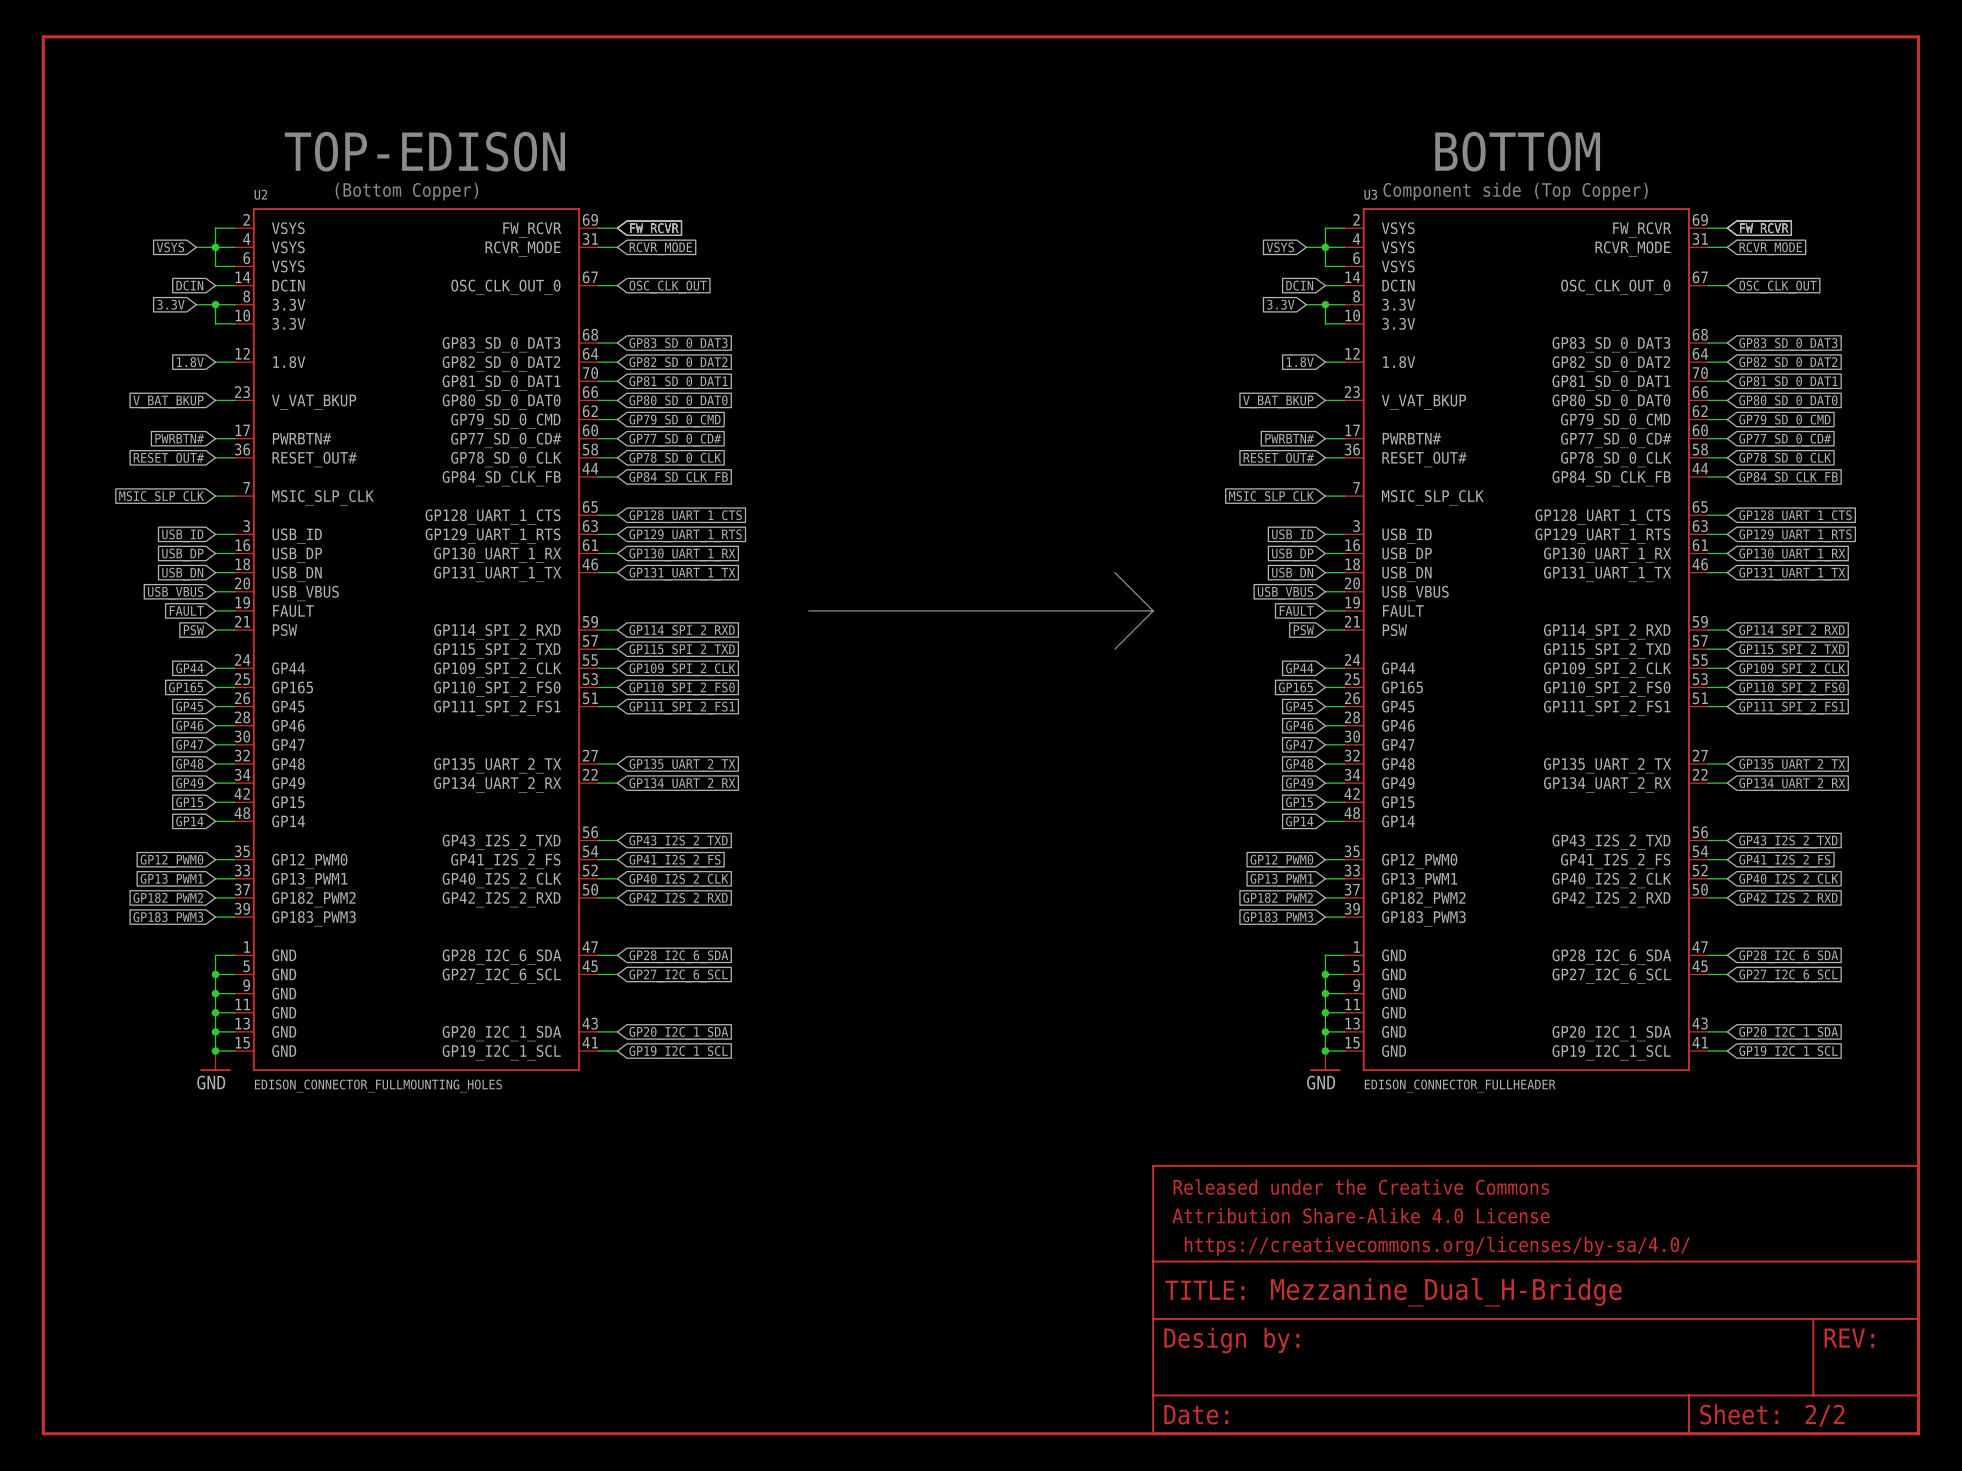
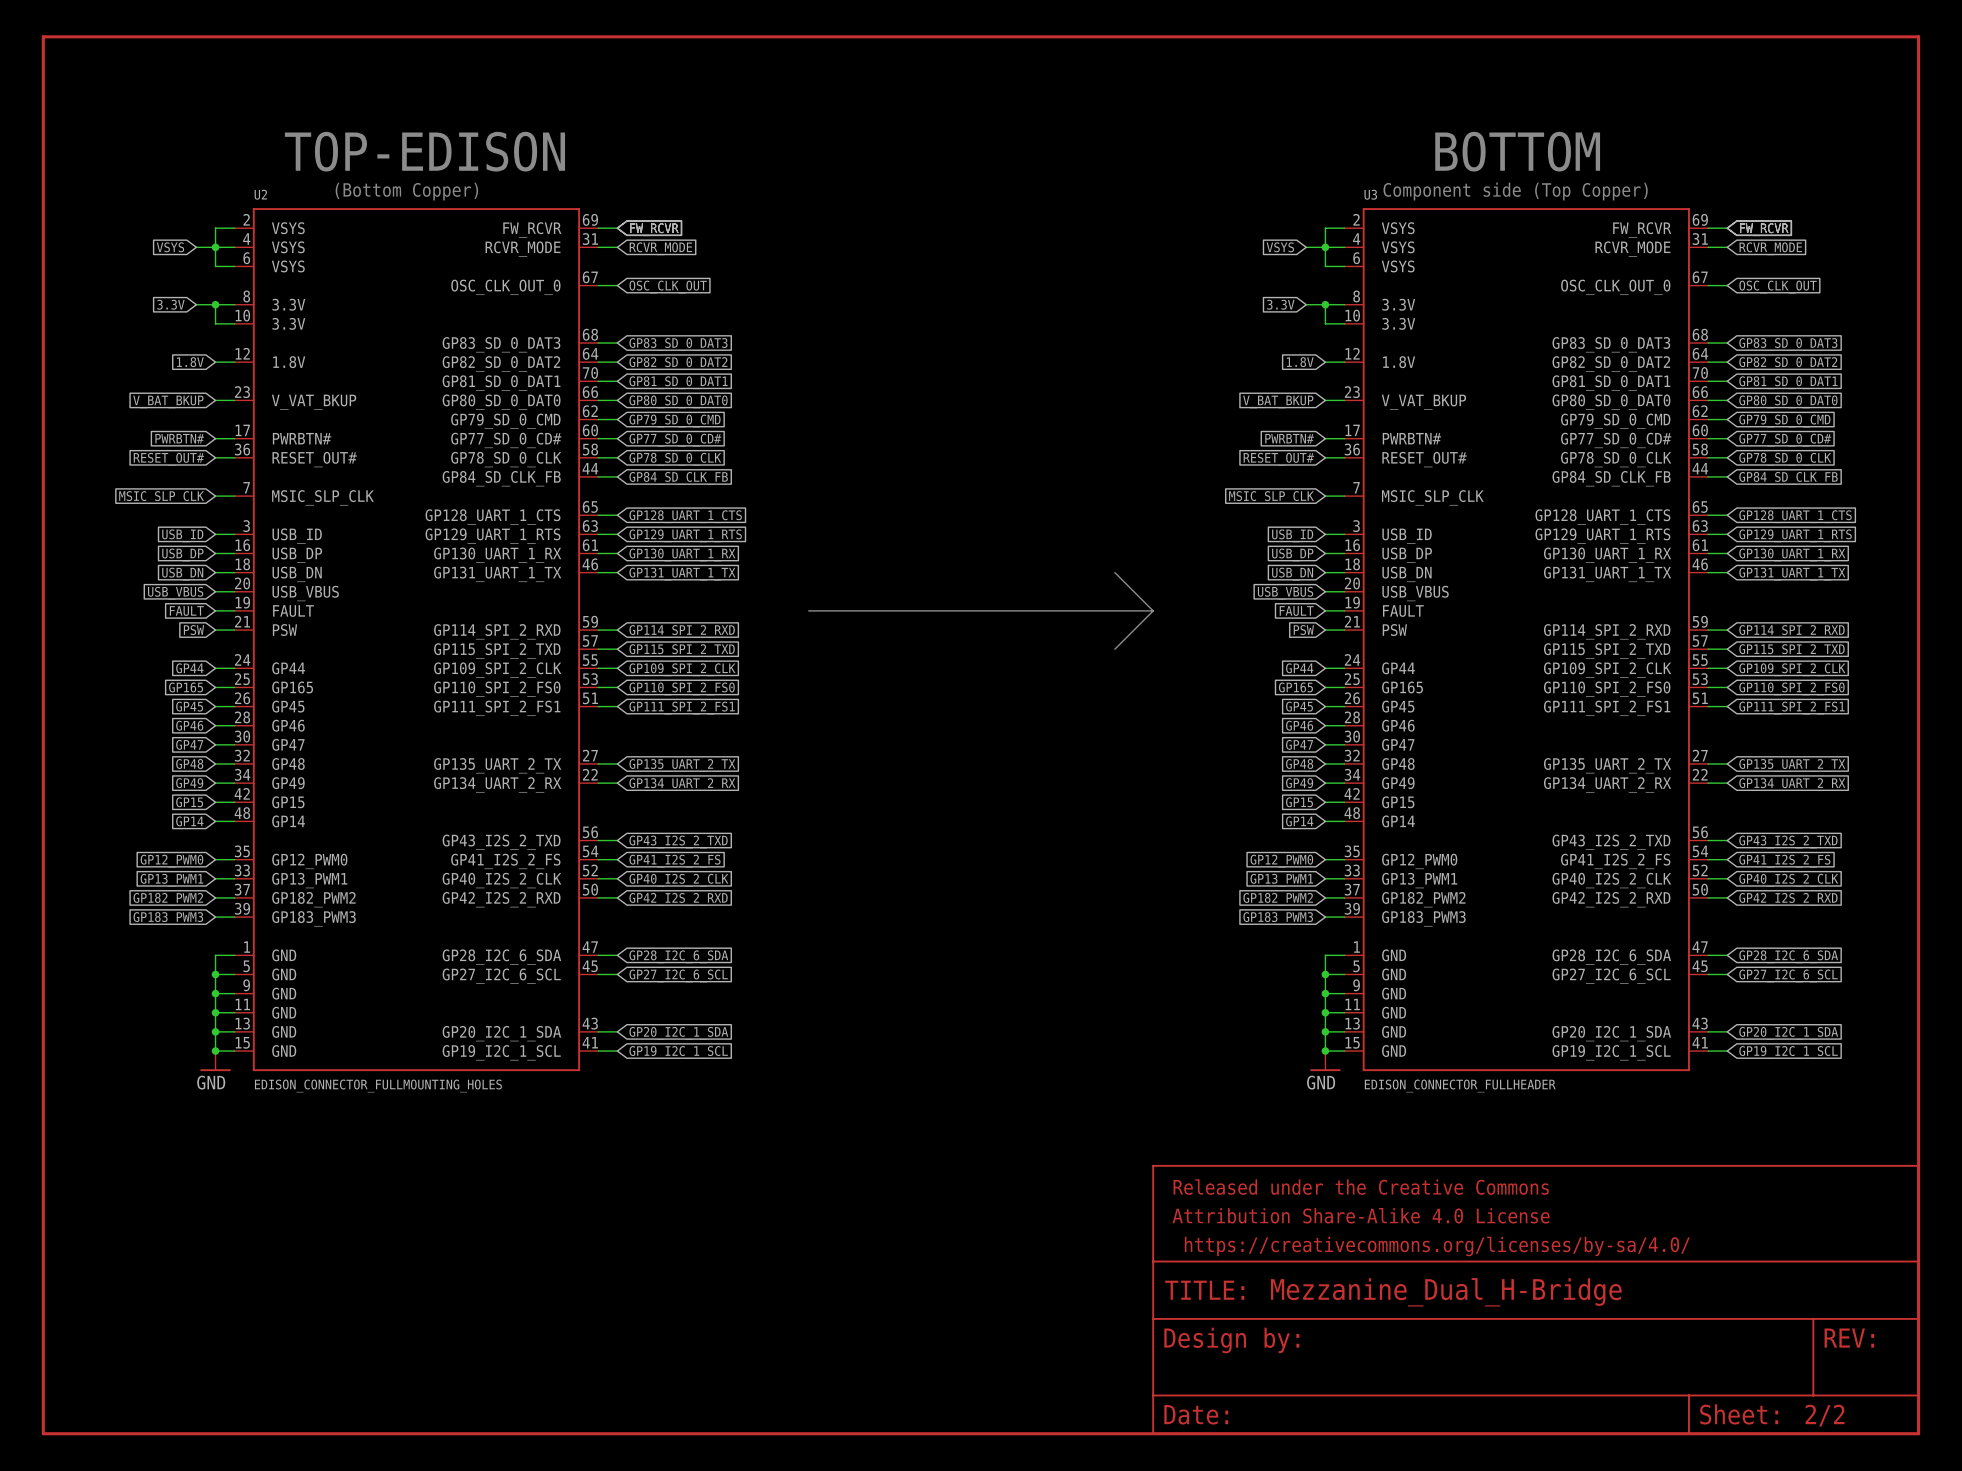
U2 symbol: [234, 208, 599, 1072] -> [234, 208, 599, 1072]
U3 symbol: [1344, 208, 1709, 1072] -> [1344, 208, 1709, 1072]
global label: DCIN (189, 285) -> none
wire: (215, 285) (234, 285) -> none
global label: DCIN (1299, 285) -> none
wire: (1325, 285) (1344, 285) -> none

